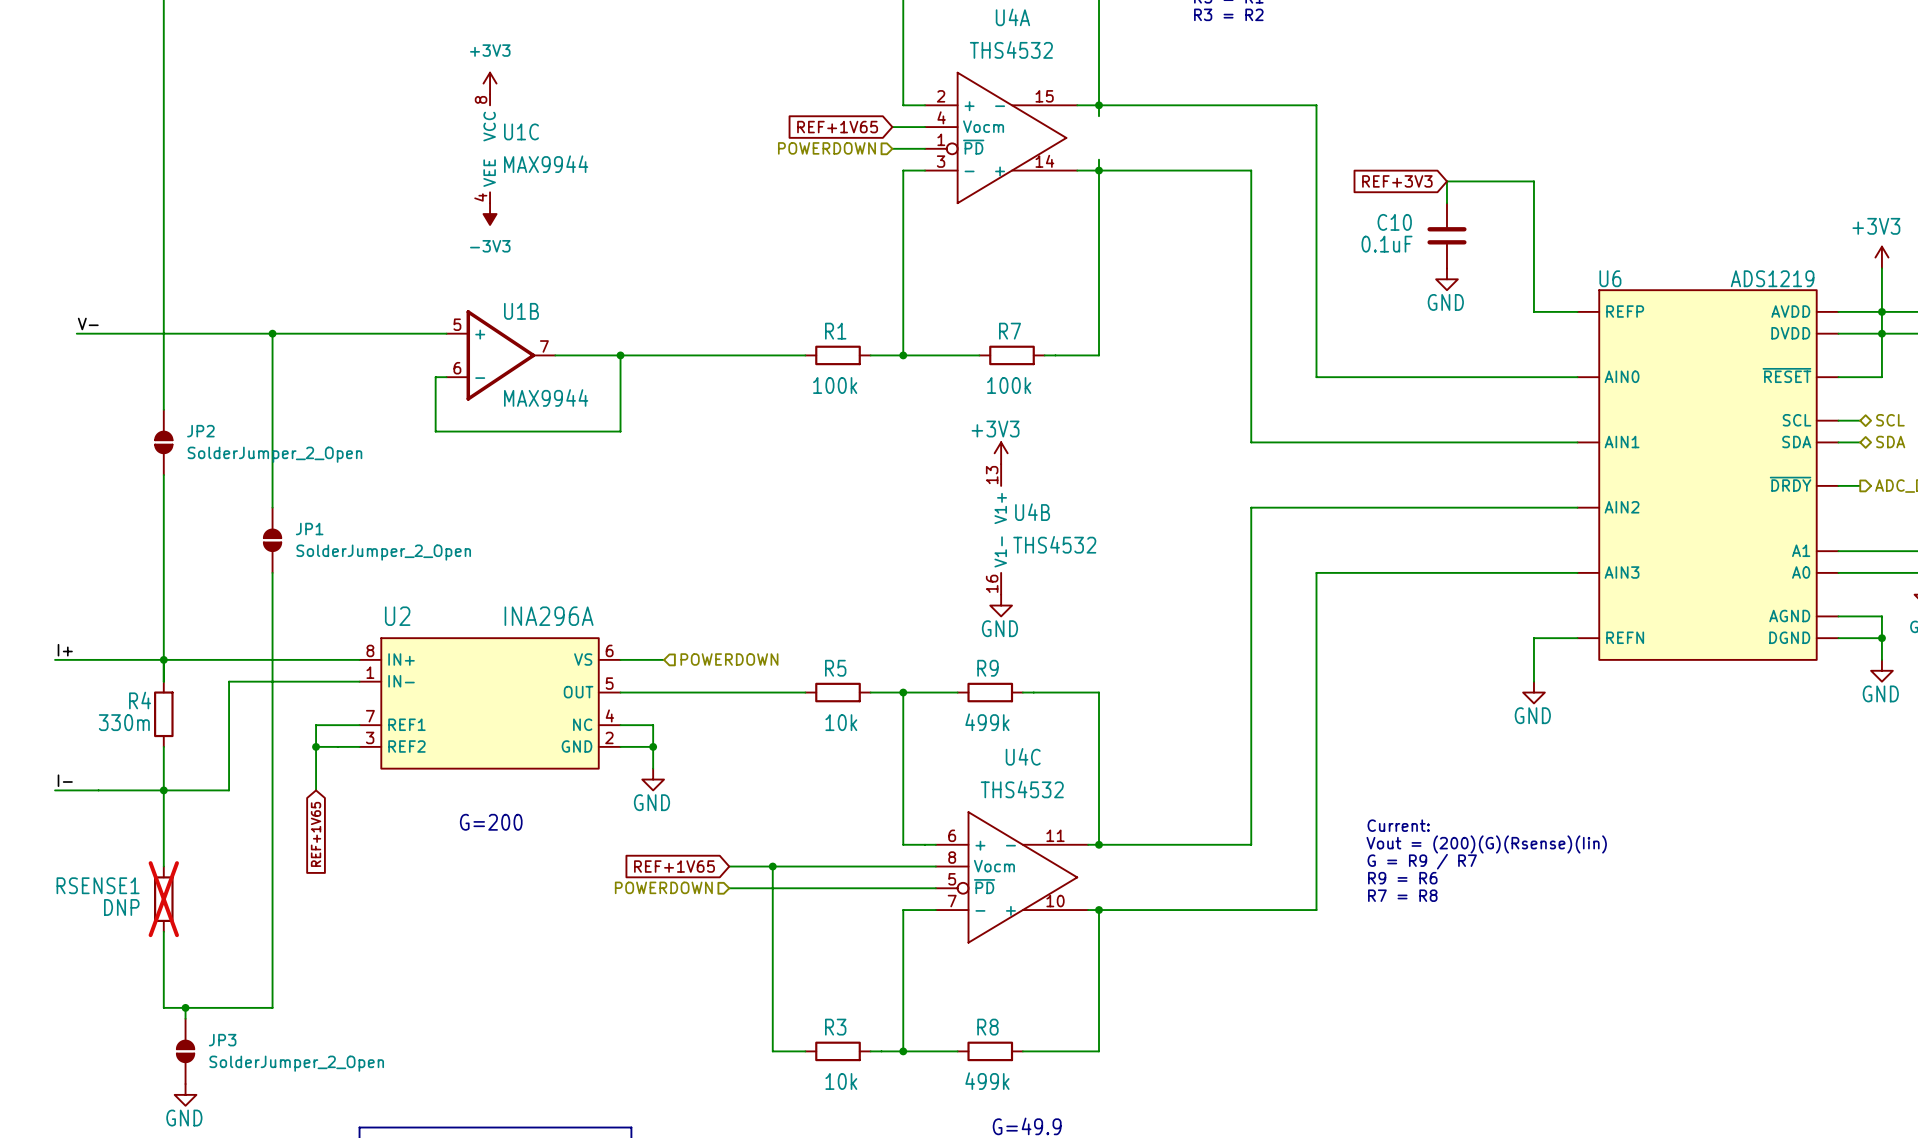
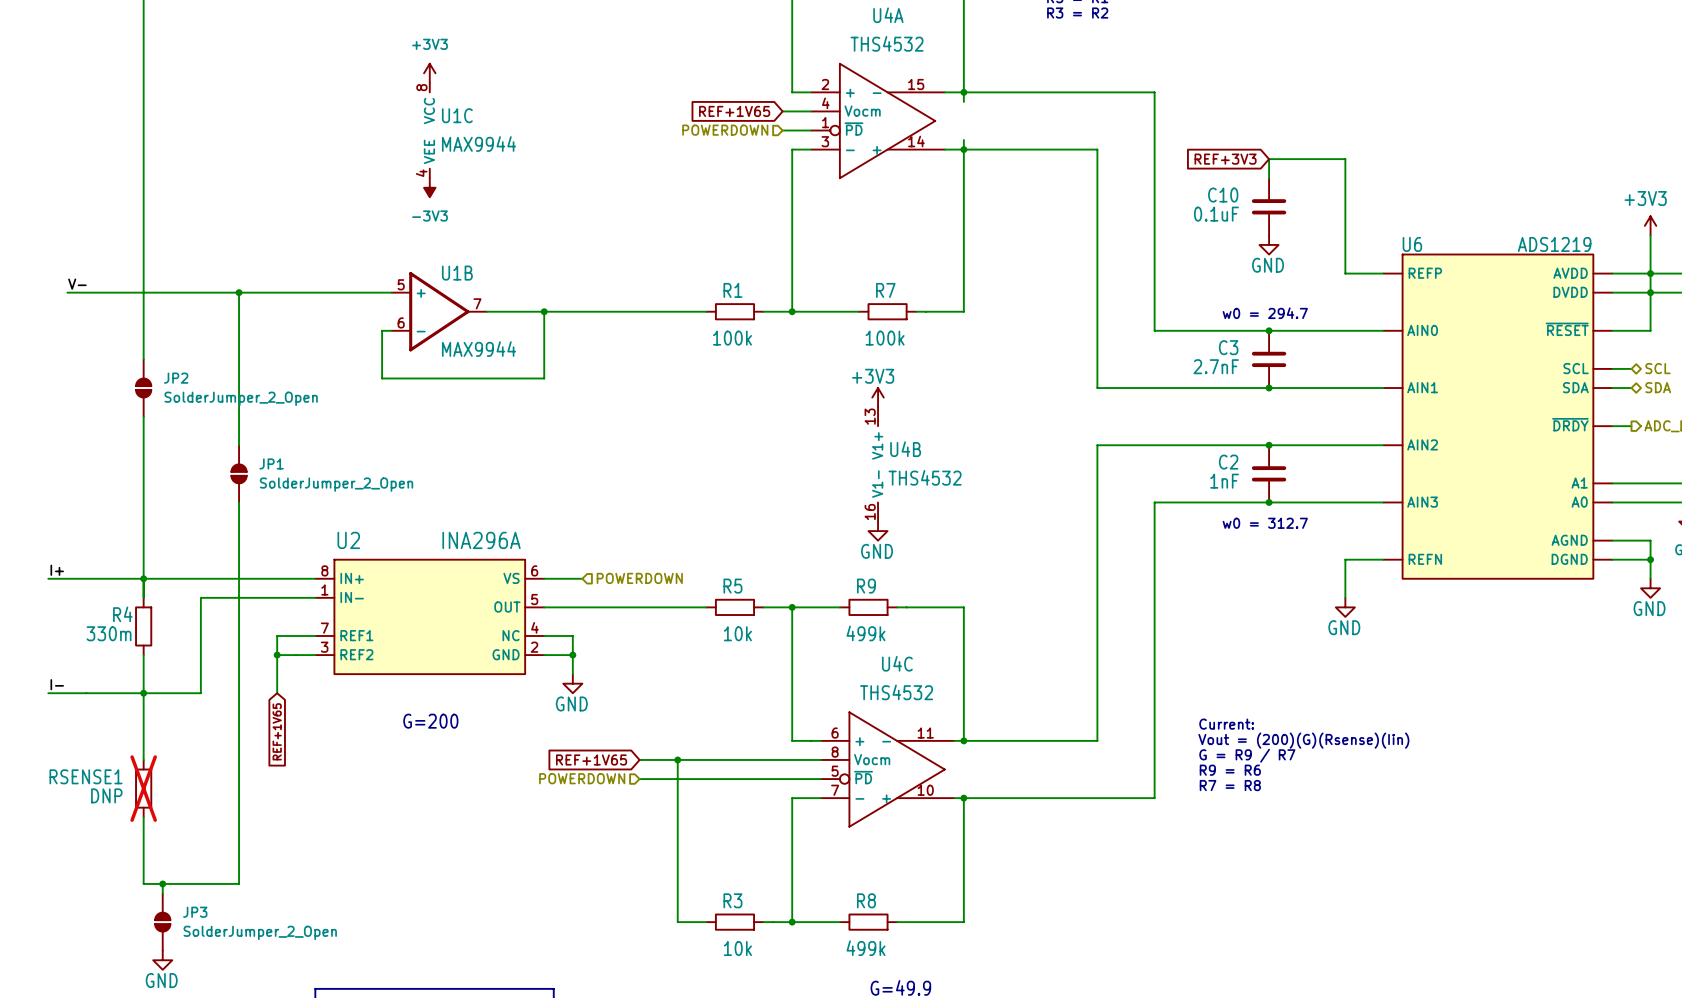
text: none -> w0 = 294.7 (1265, 313)
junction: none -> (1269, 330)
C3: none -> 2.7nF (1269, 359)
junction: none -> (1269, 388)
junction: none -> (1269, 445)
C2: none -> 1nF (1269, 473)
junction: none -> (1269, 502)
text: none -> w0 = 312.7 (1265, 523)

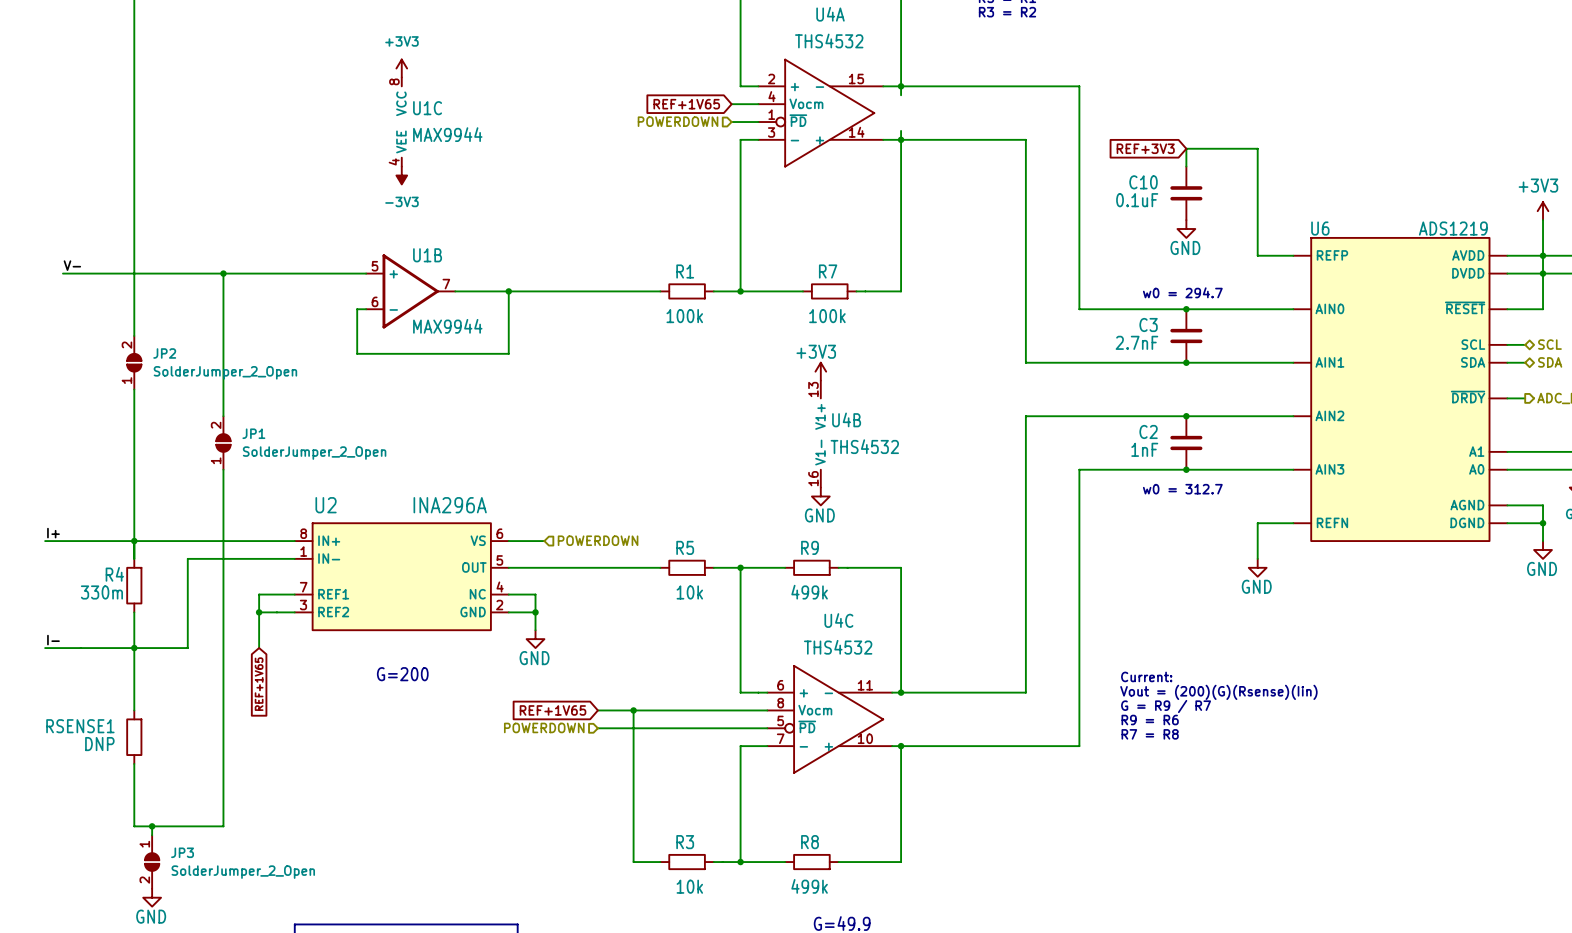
JP2 pin number: none -> 2 (126, 345)
JP2 pin number: none -> 1 (126, 380)
JP1 pin number: none -> 2 (216, 425)
JP1 pin number: none -> 1 (216, 460)
RSENSE1 do-not-place cross: (143, 788) -> none
JP3 pin number: none -> 1 (144, 844)
JP3 pin number: none -> 2 (144, 880)

